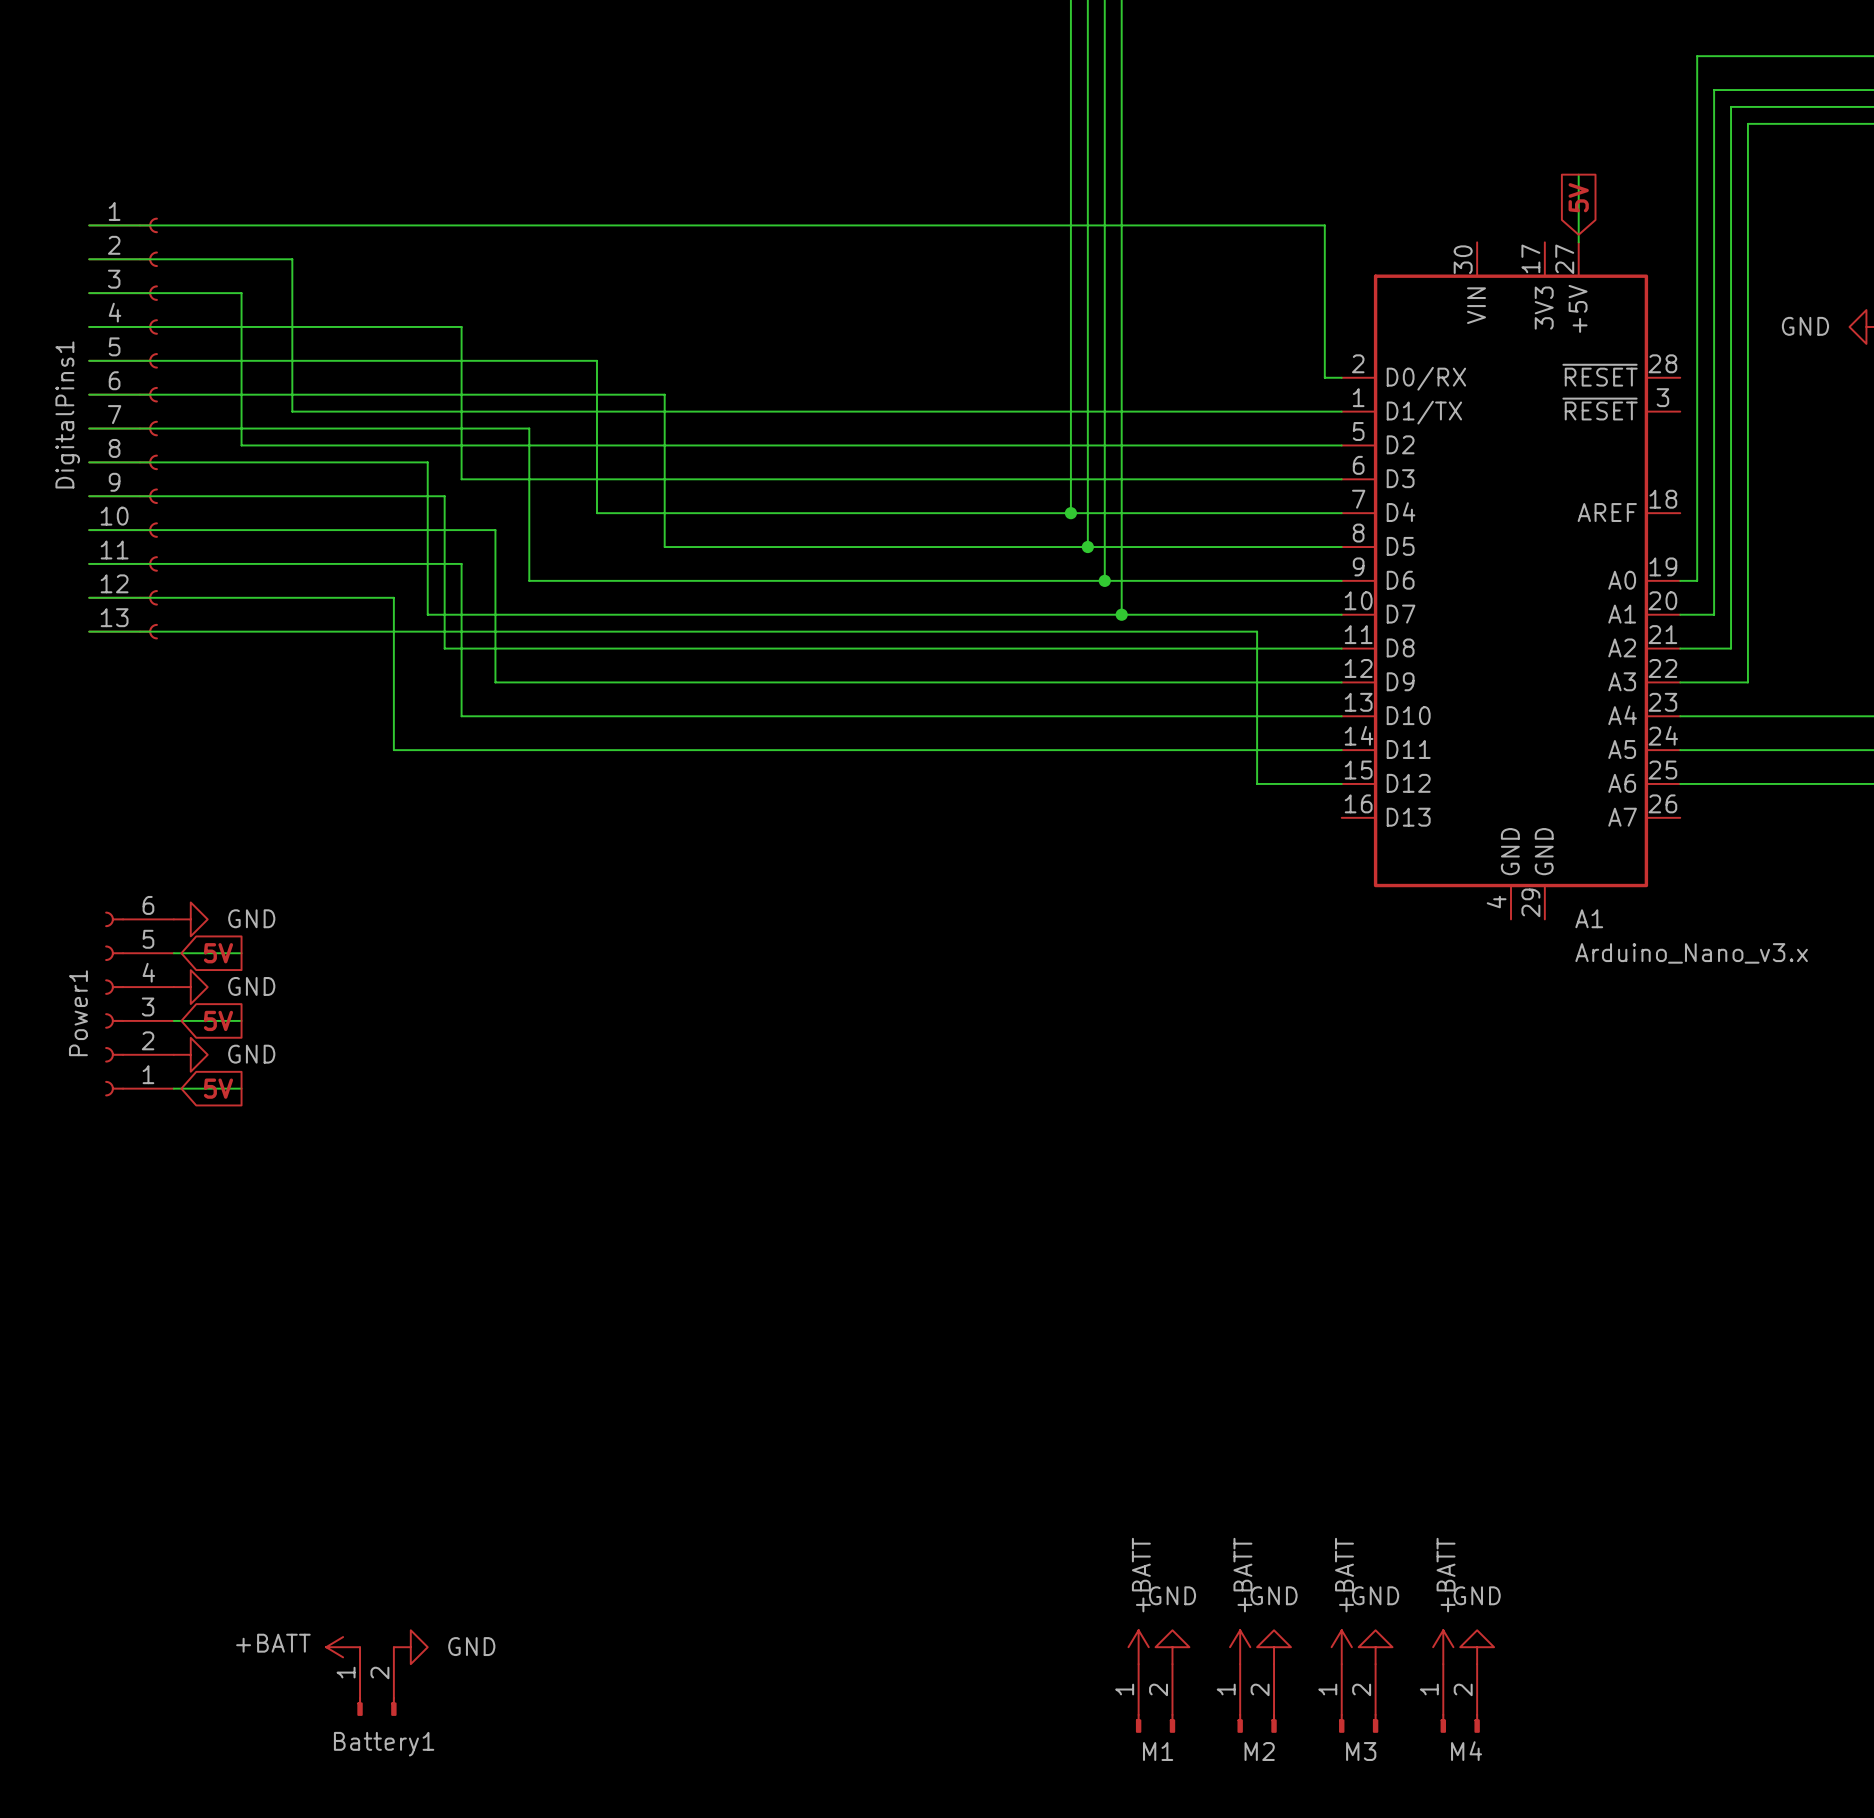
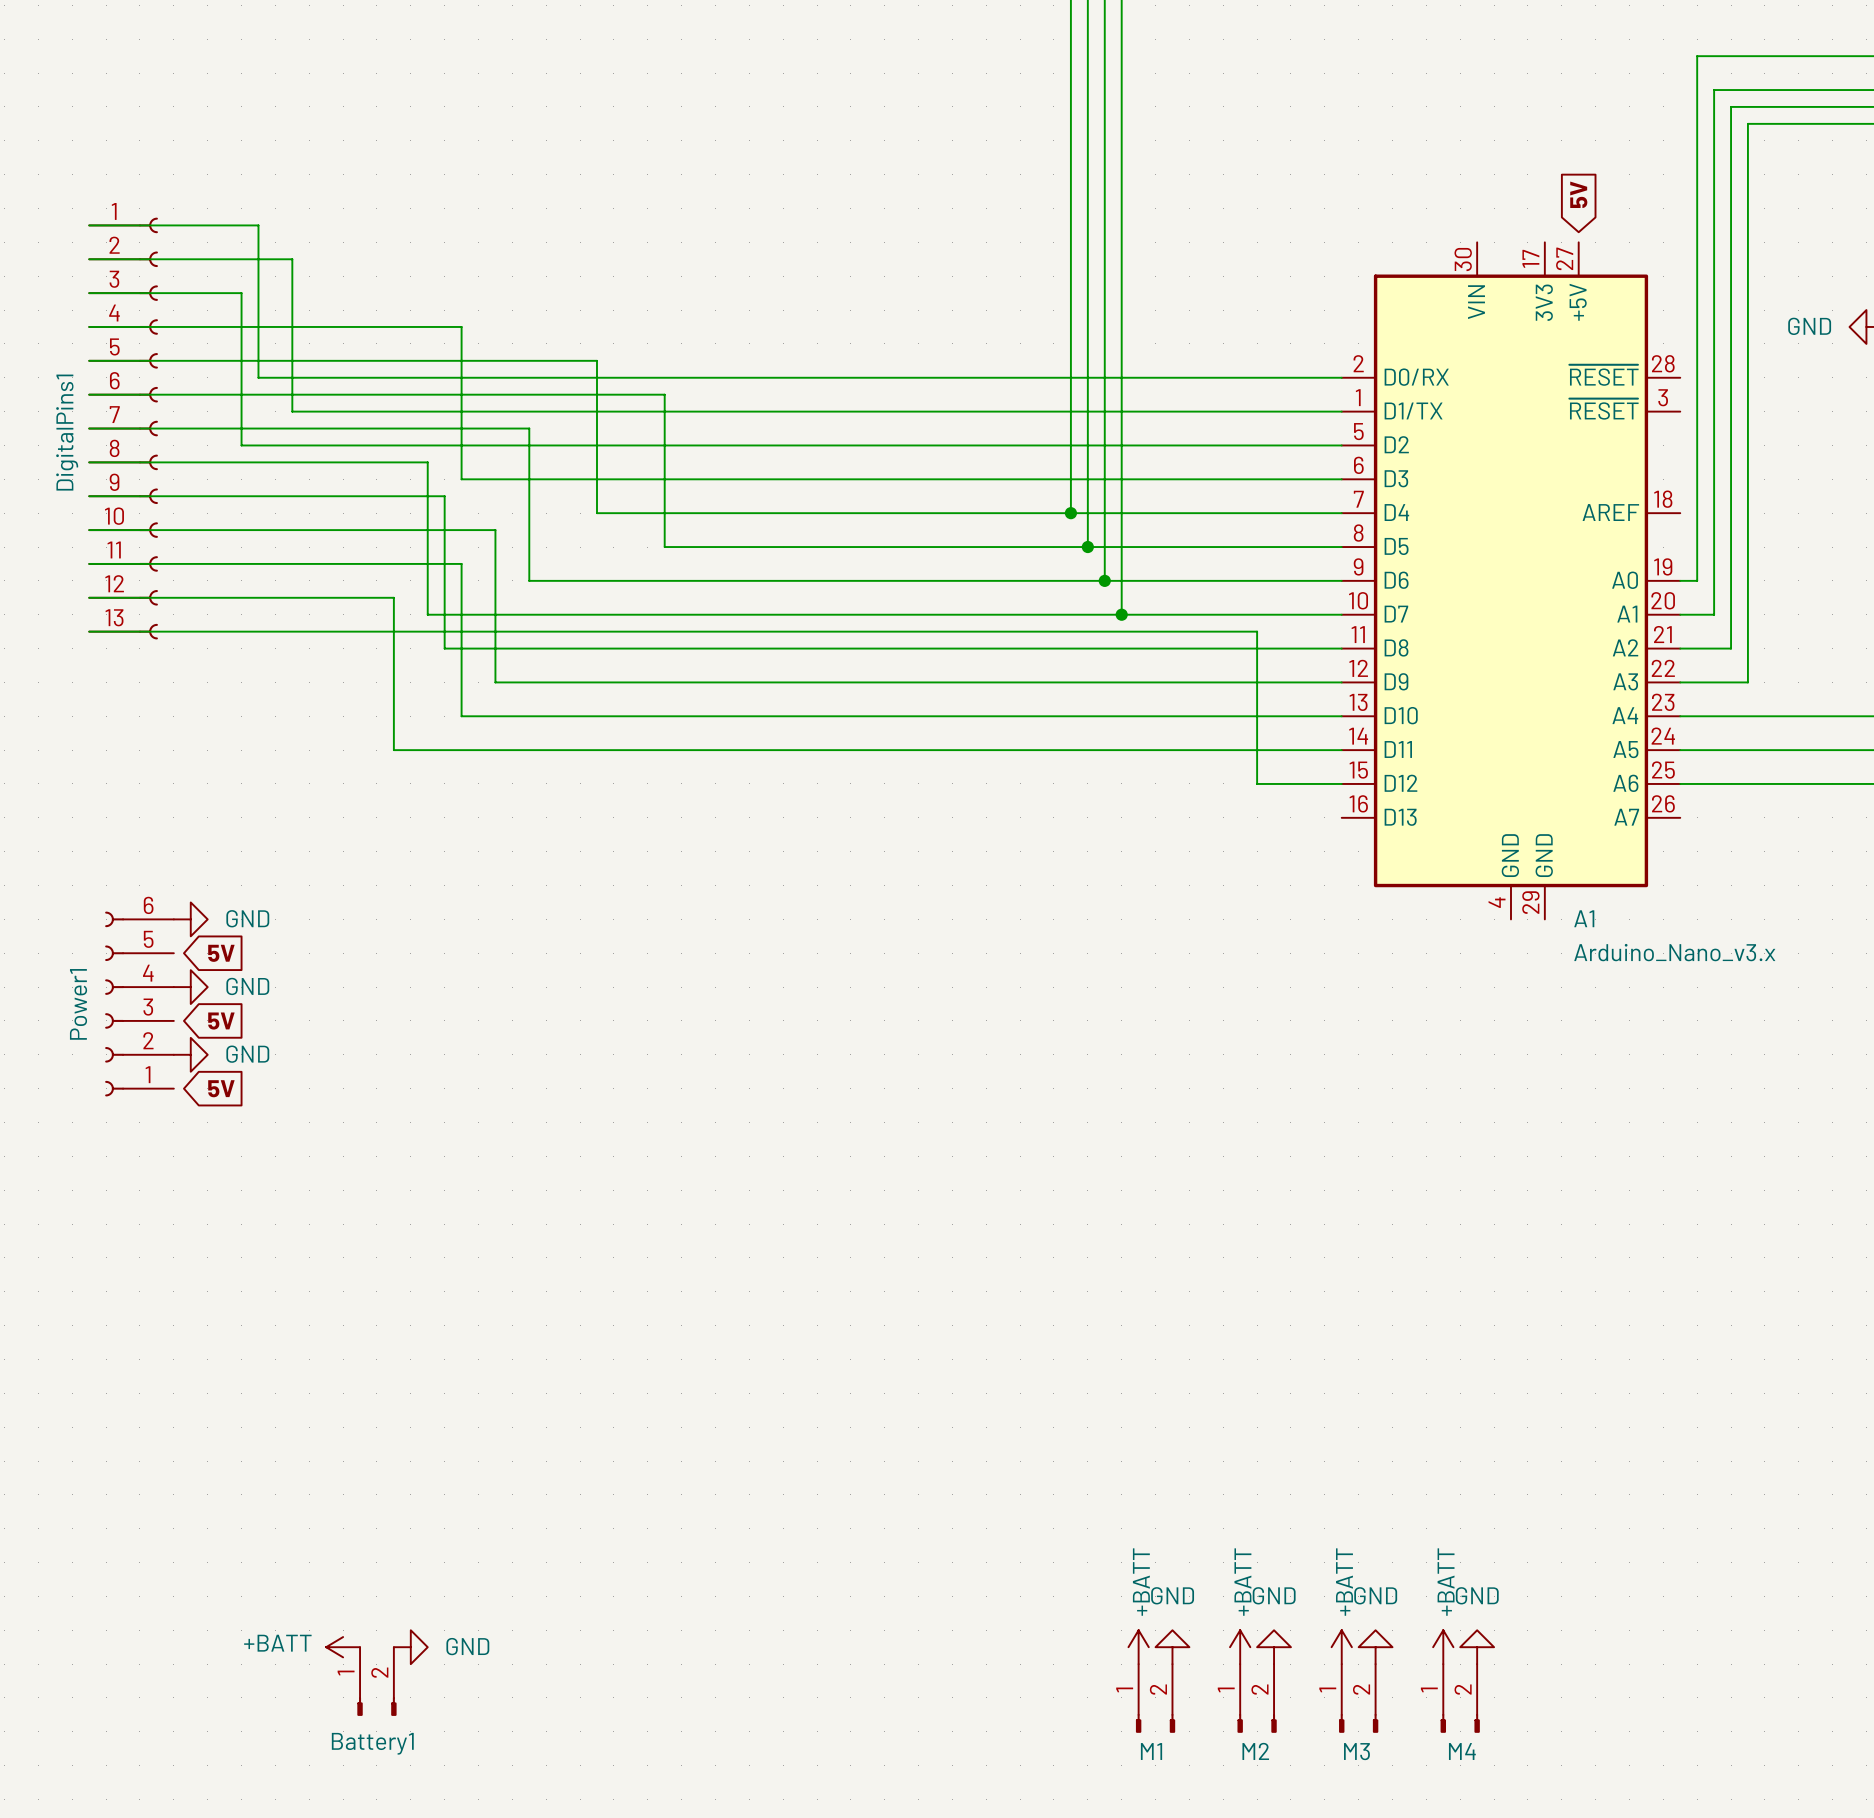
wire: (1578, 174) (1578, 242) -> none
wire: (258, 225) (1324, 225) (1324, 377) -> (258, 225) (258, 377) (1324, 377)
wire: (173, 953) (241, 953) -> none
wire: (173, 1020) (241, 1020) -> none
wire: (173, 1088) (241, 1088) -> none

